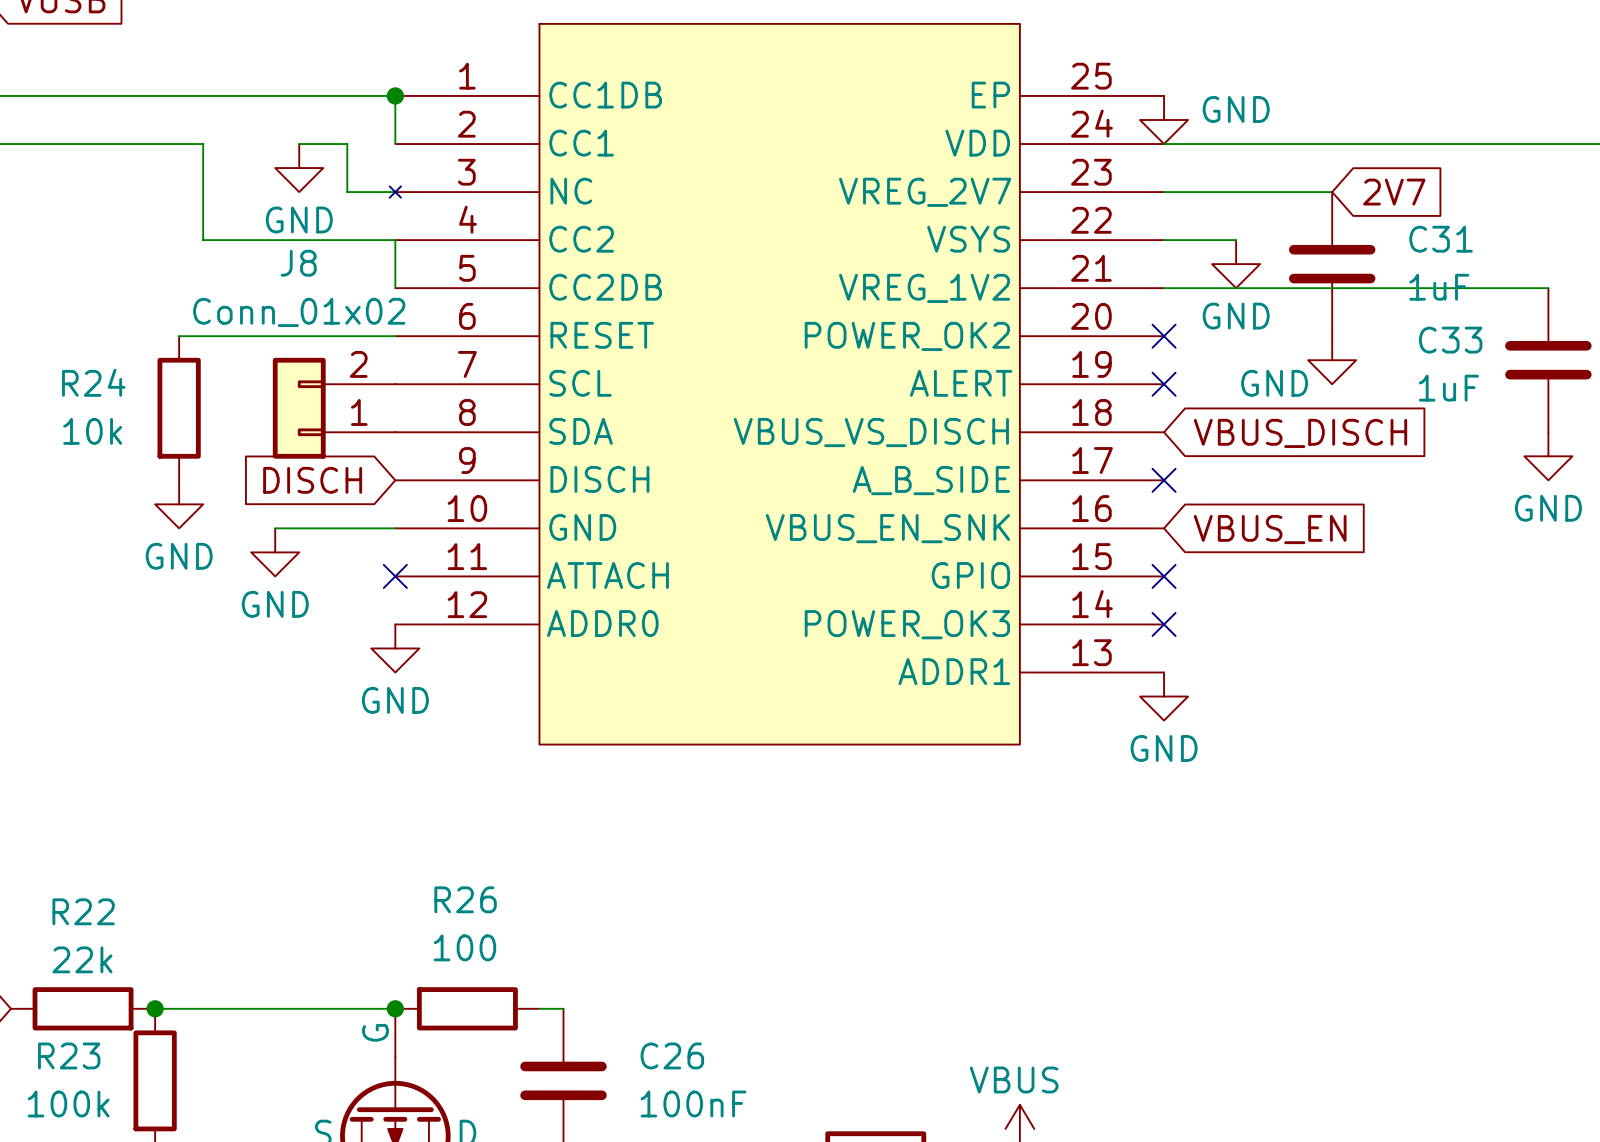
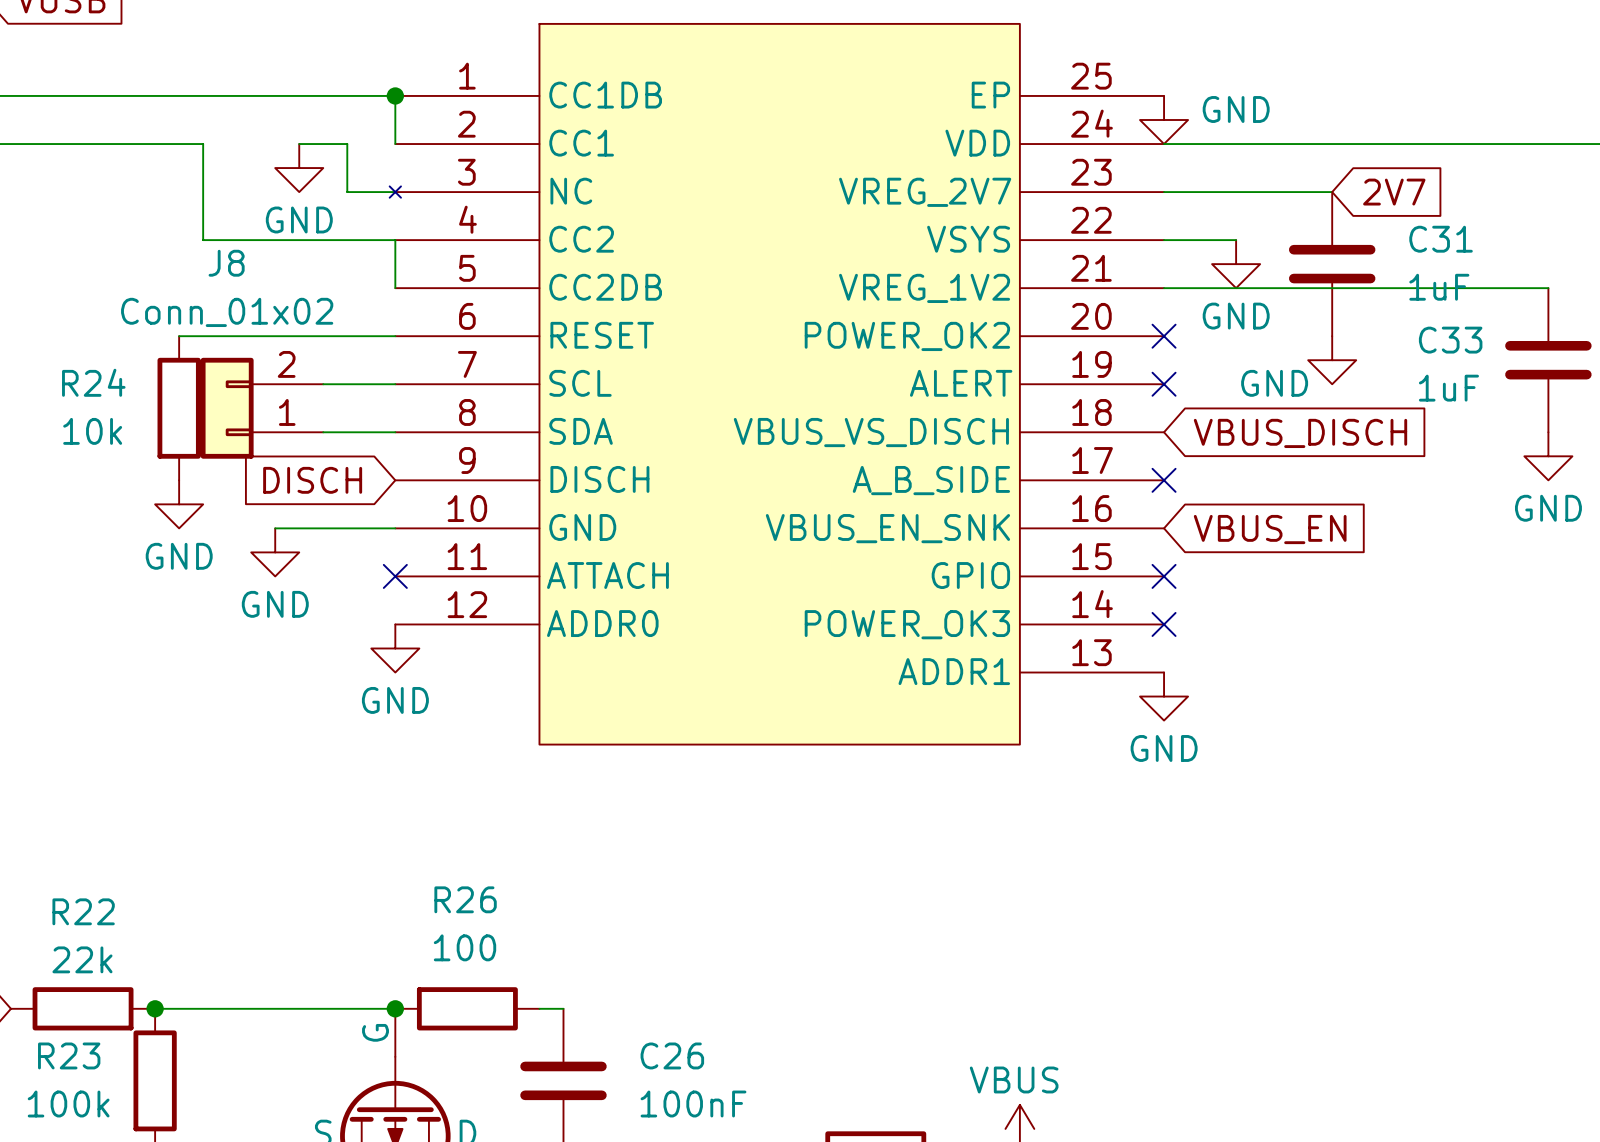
J8 position: (334, 408) -> (262, 408)

